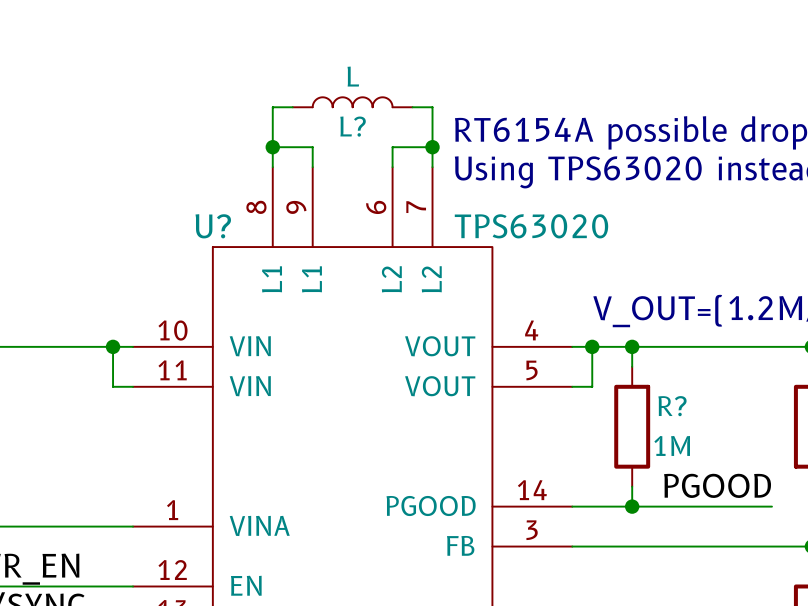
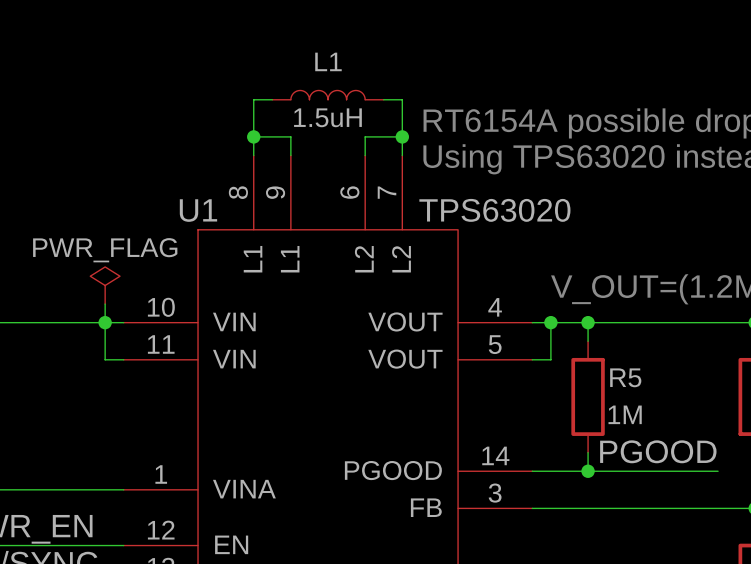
L? value: L (353, 76) -> 1.5uH (327, 117)
L? name: L? (353, 126) -> L1 (328, 61)
U? name: U? (213, 226) -> U1 (198, 210)
power symbol: none -> PWR_FLAG (105, 285)
wire: none -> (105, 304) (105, 322)
R? name: R? (672, 406) -> R5 (625, 377)

